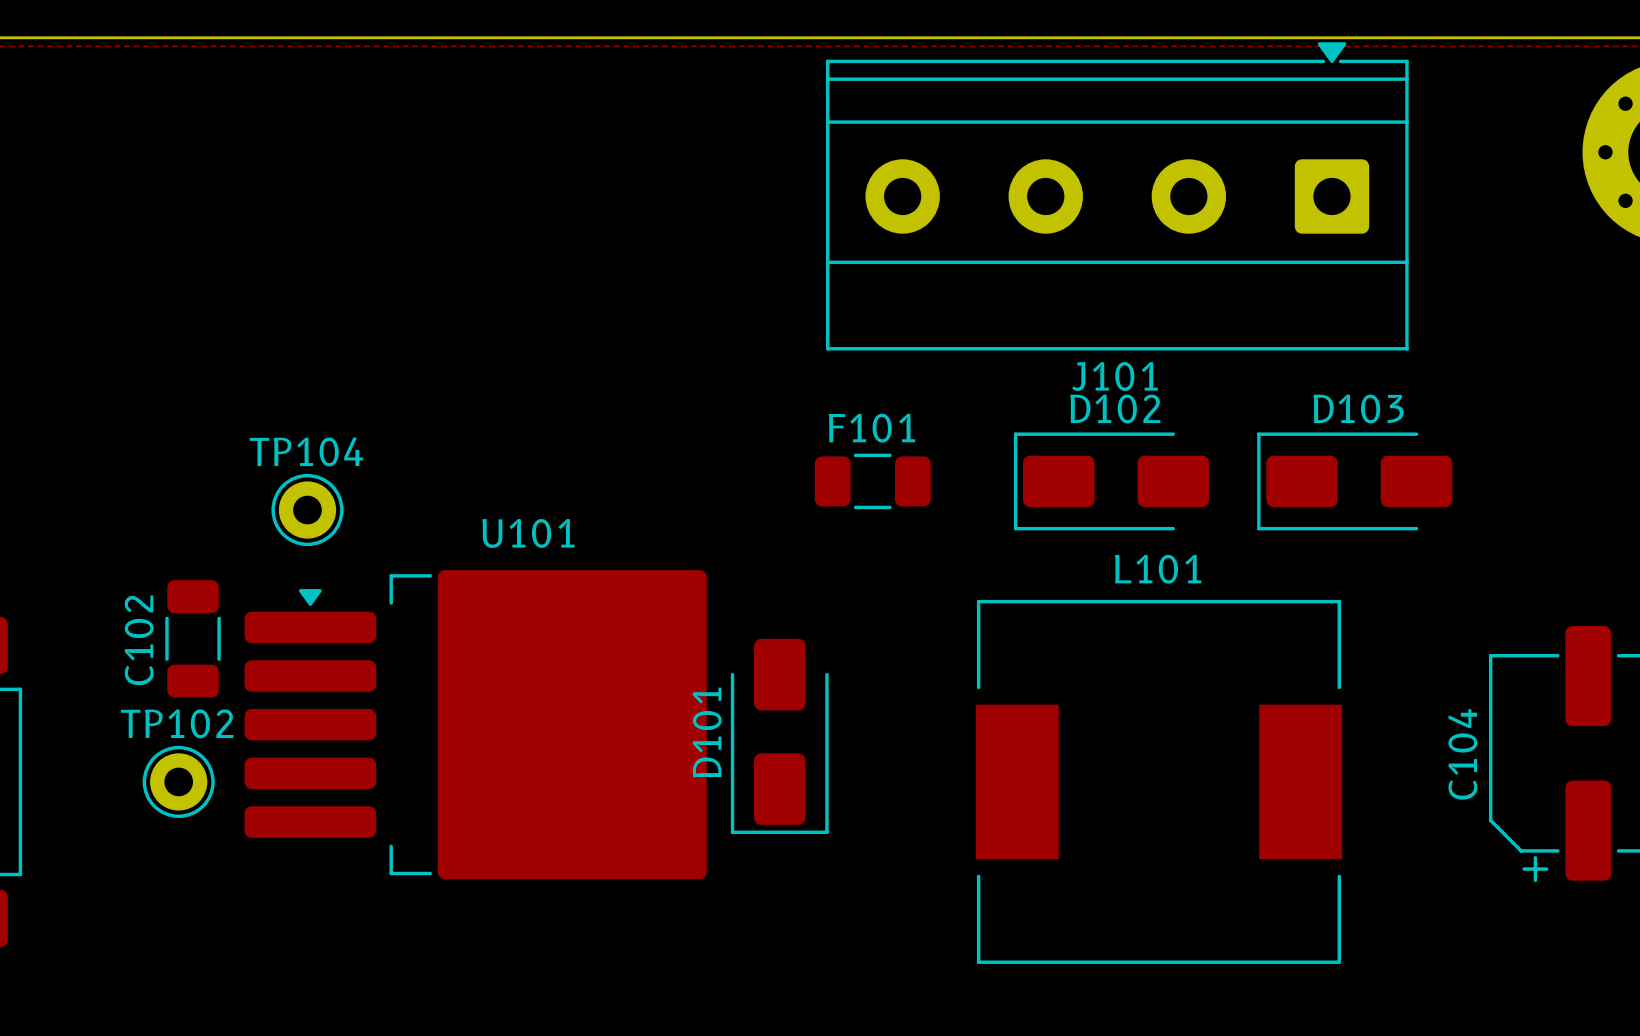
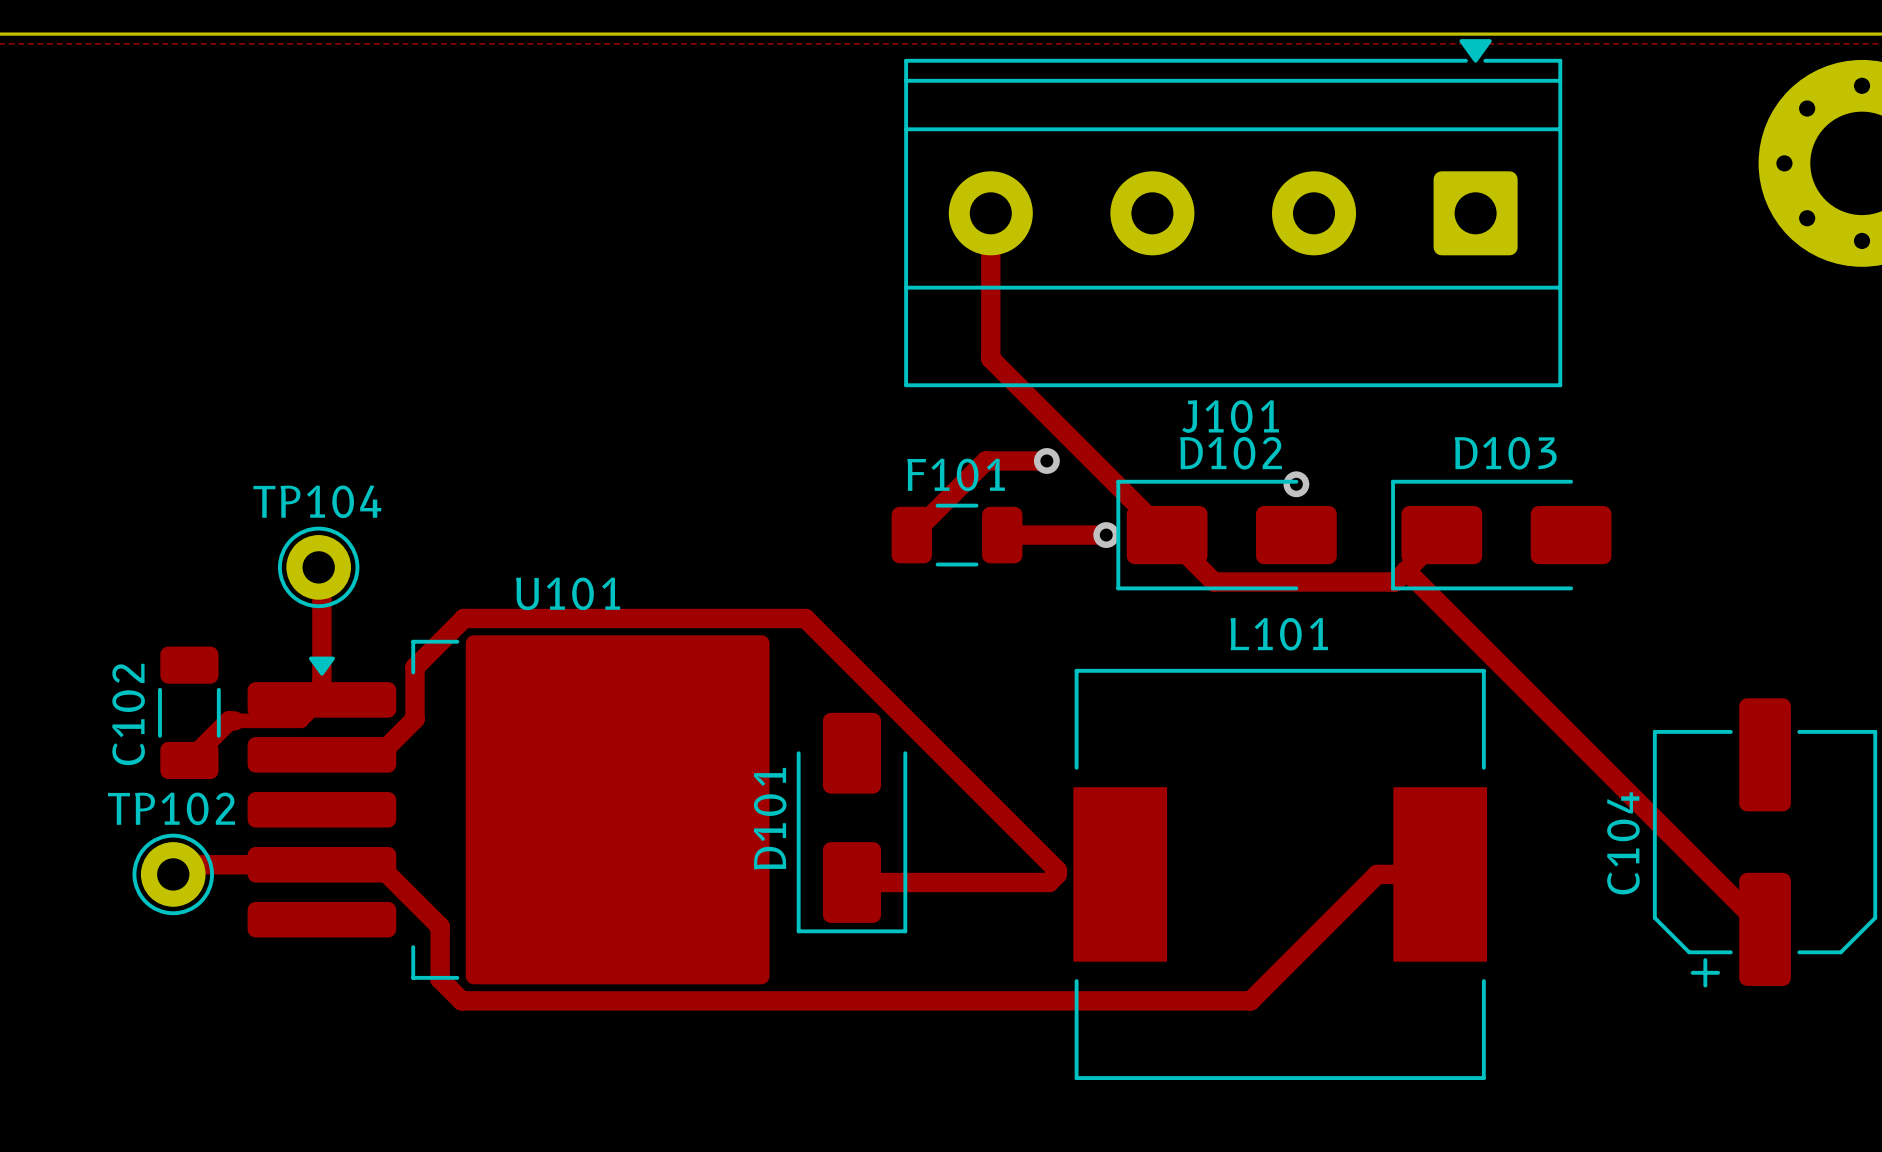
track: none -> (990, 213) (990, 358) (1214, 582) (1394, 582) (1441, 535)
track: none -> (1046, 460) (985, 460) (911, 535)
via: none -> (1046, 460)
via: none -> (1296, 484)
track: none -> (1002, 535) (1106, 535)
via: none -> (1106, 535)
track: none -> (318, 567) (321, 570) (321, 699) (300, 720) (229, 720) (189, 760)
track: none -> (1406, 570) (1765, 929)
track: none -> (321, 754) (379, 754) (414, 719) (414, 667) (463, 618) (805, 618) (1057, 870) (1057, 874) (1049, 882) (851, 882)
track: none -> (173, 874) (182, 864) (378, 864) (440, 926) (440, 979) (461, 1000) (1250, 1000) (1377, 874) (1440, 874)

